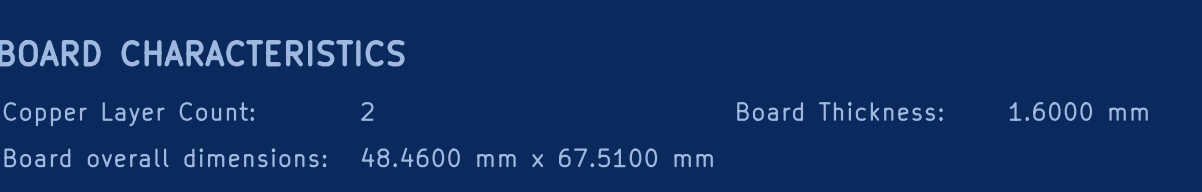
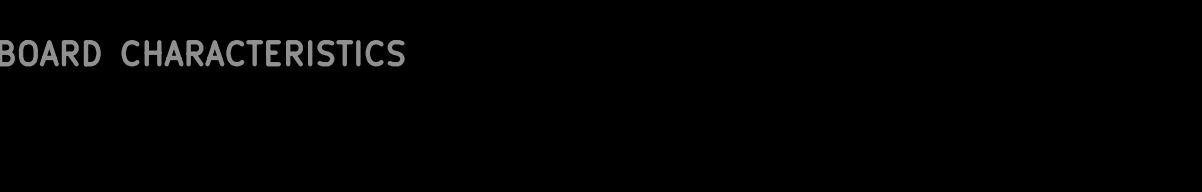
text: 2 (367, 111) -> none
text: Board Thickness: (840, 111) -> none
text: 1.6000 mm (1078, 111) -> none
text: Copper Layer Count: (128, 114) -> none
text: Board overall dimensions: (165, 157) -> none
text: 48.4600 mm x 67.5100 mm (537, 157) -> none

